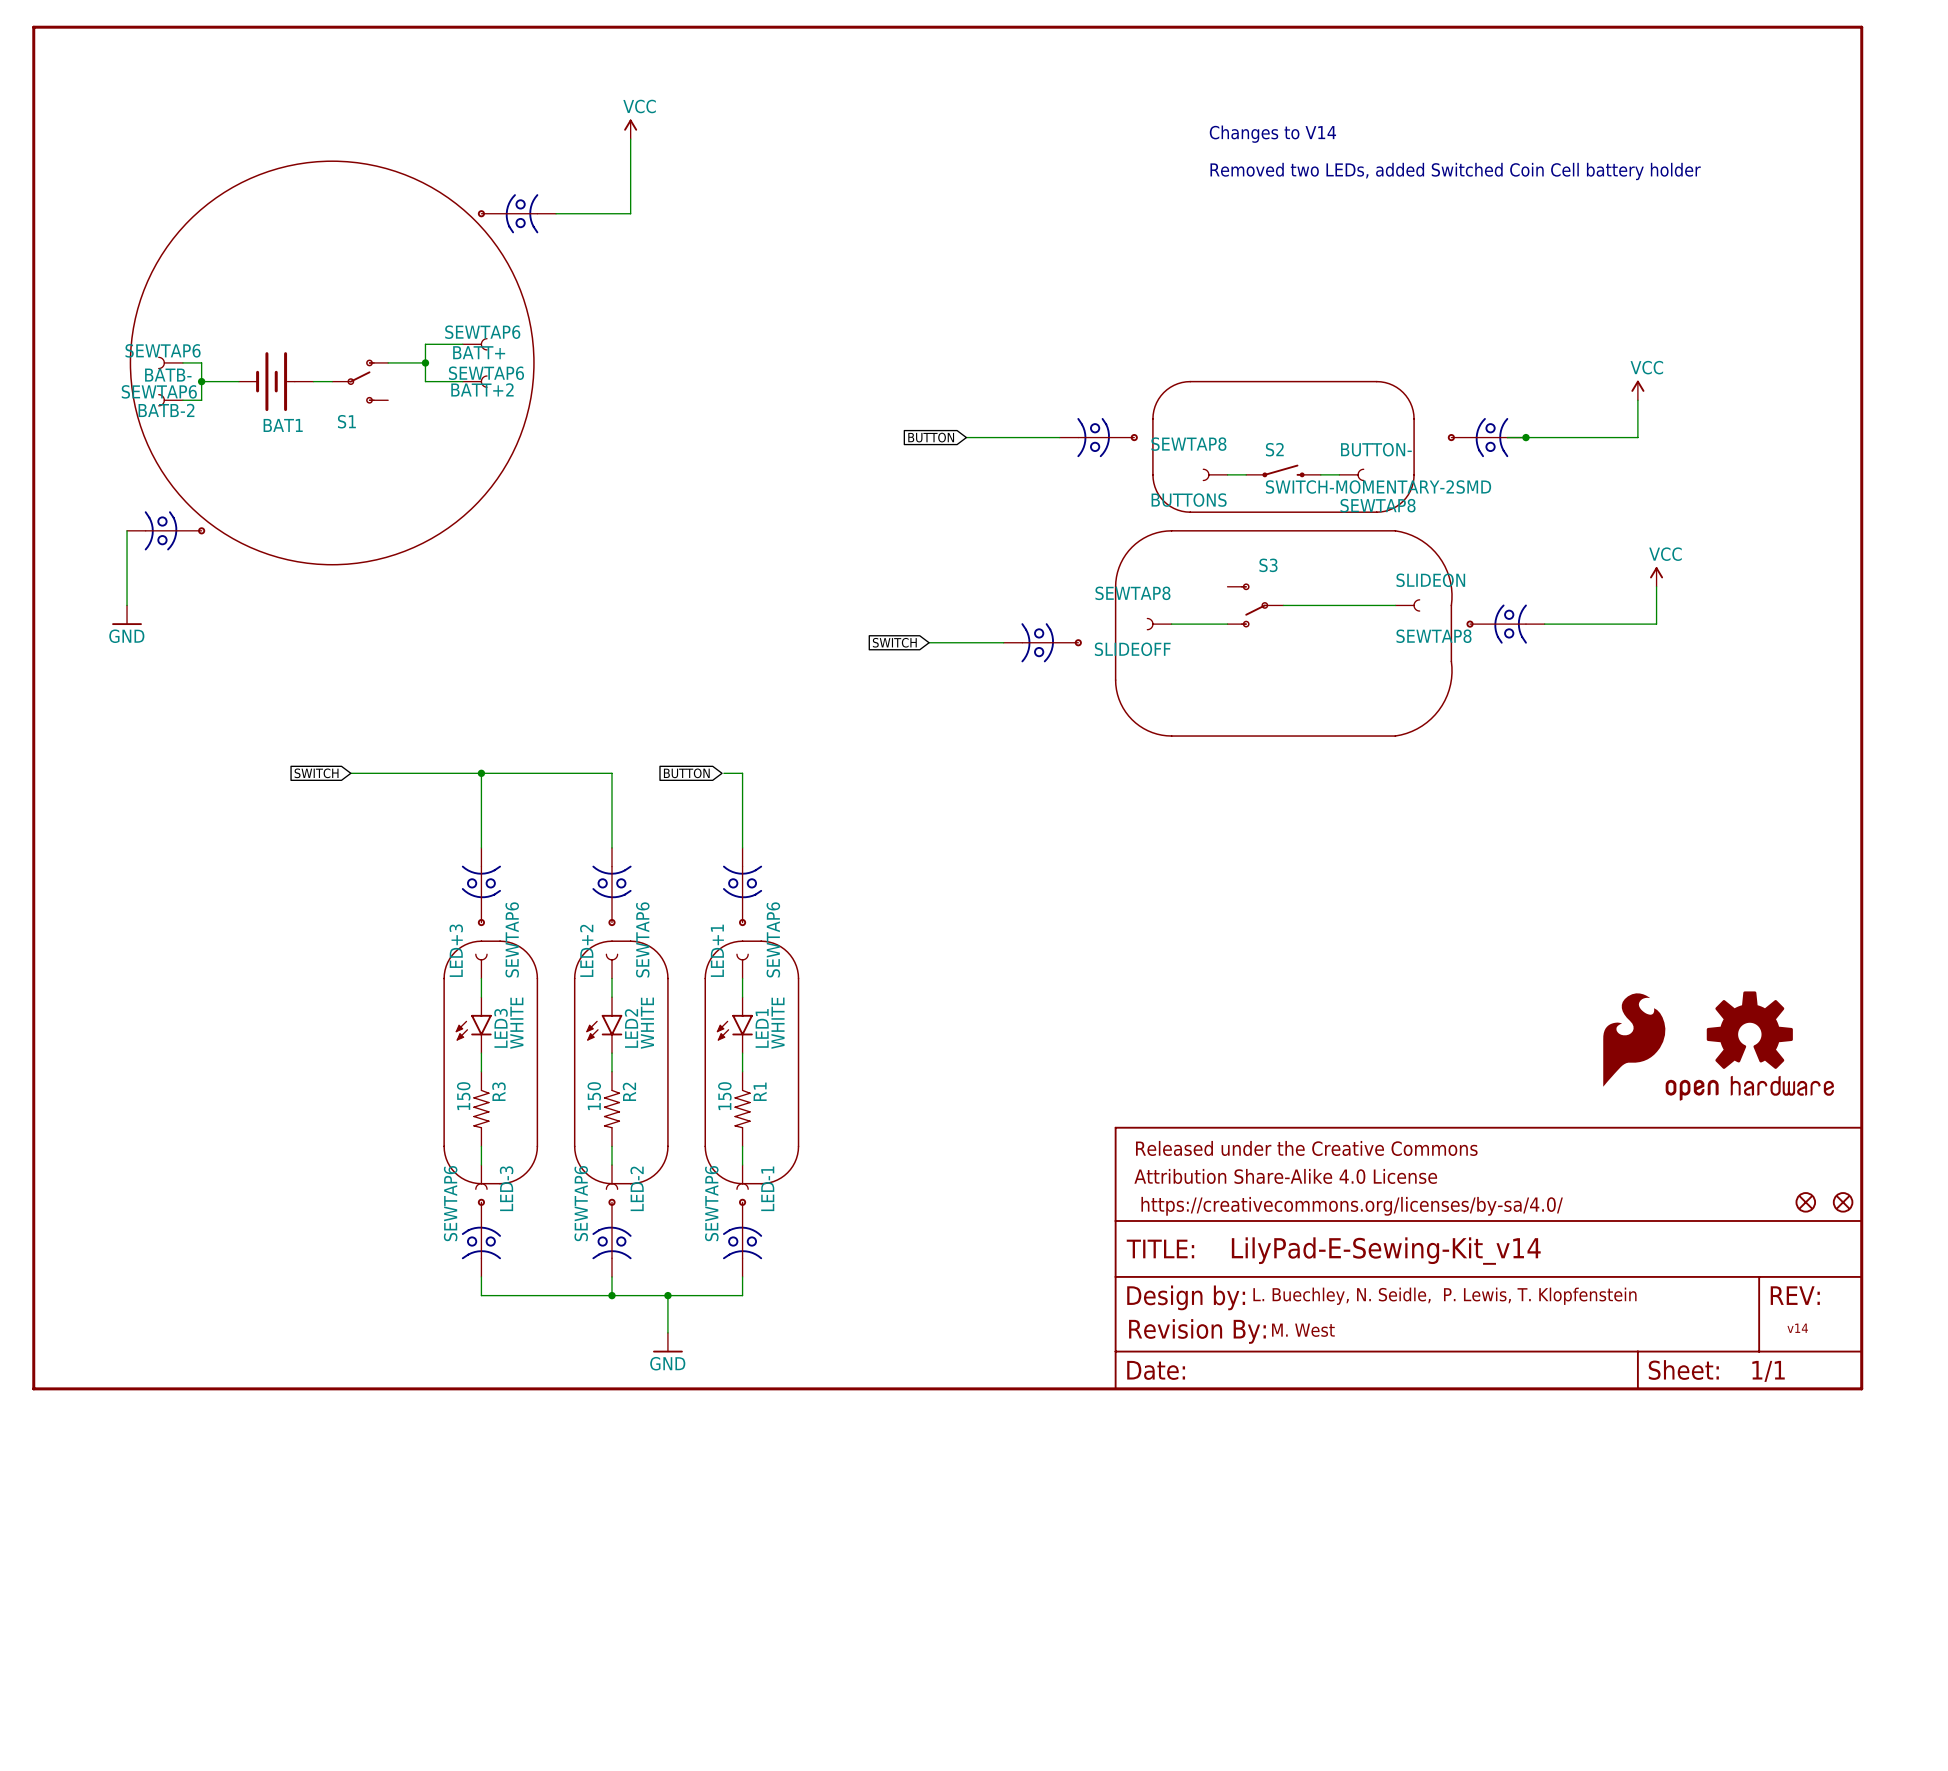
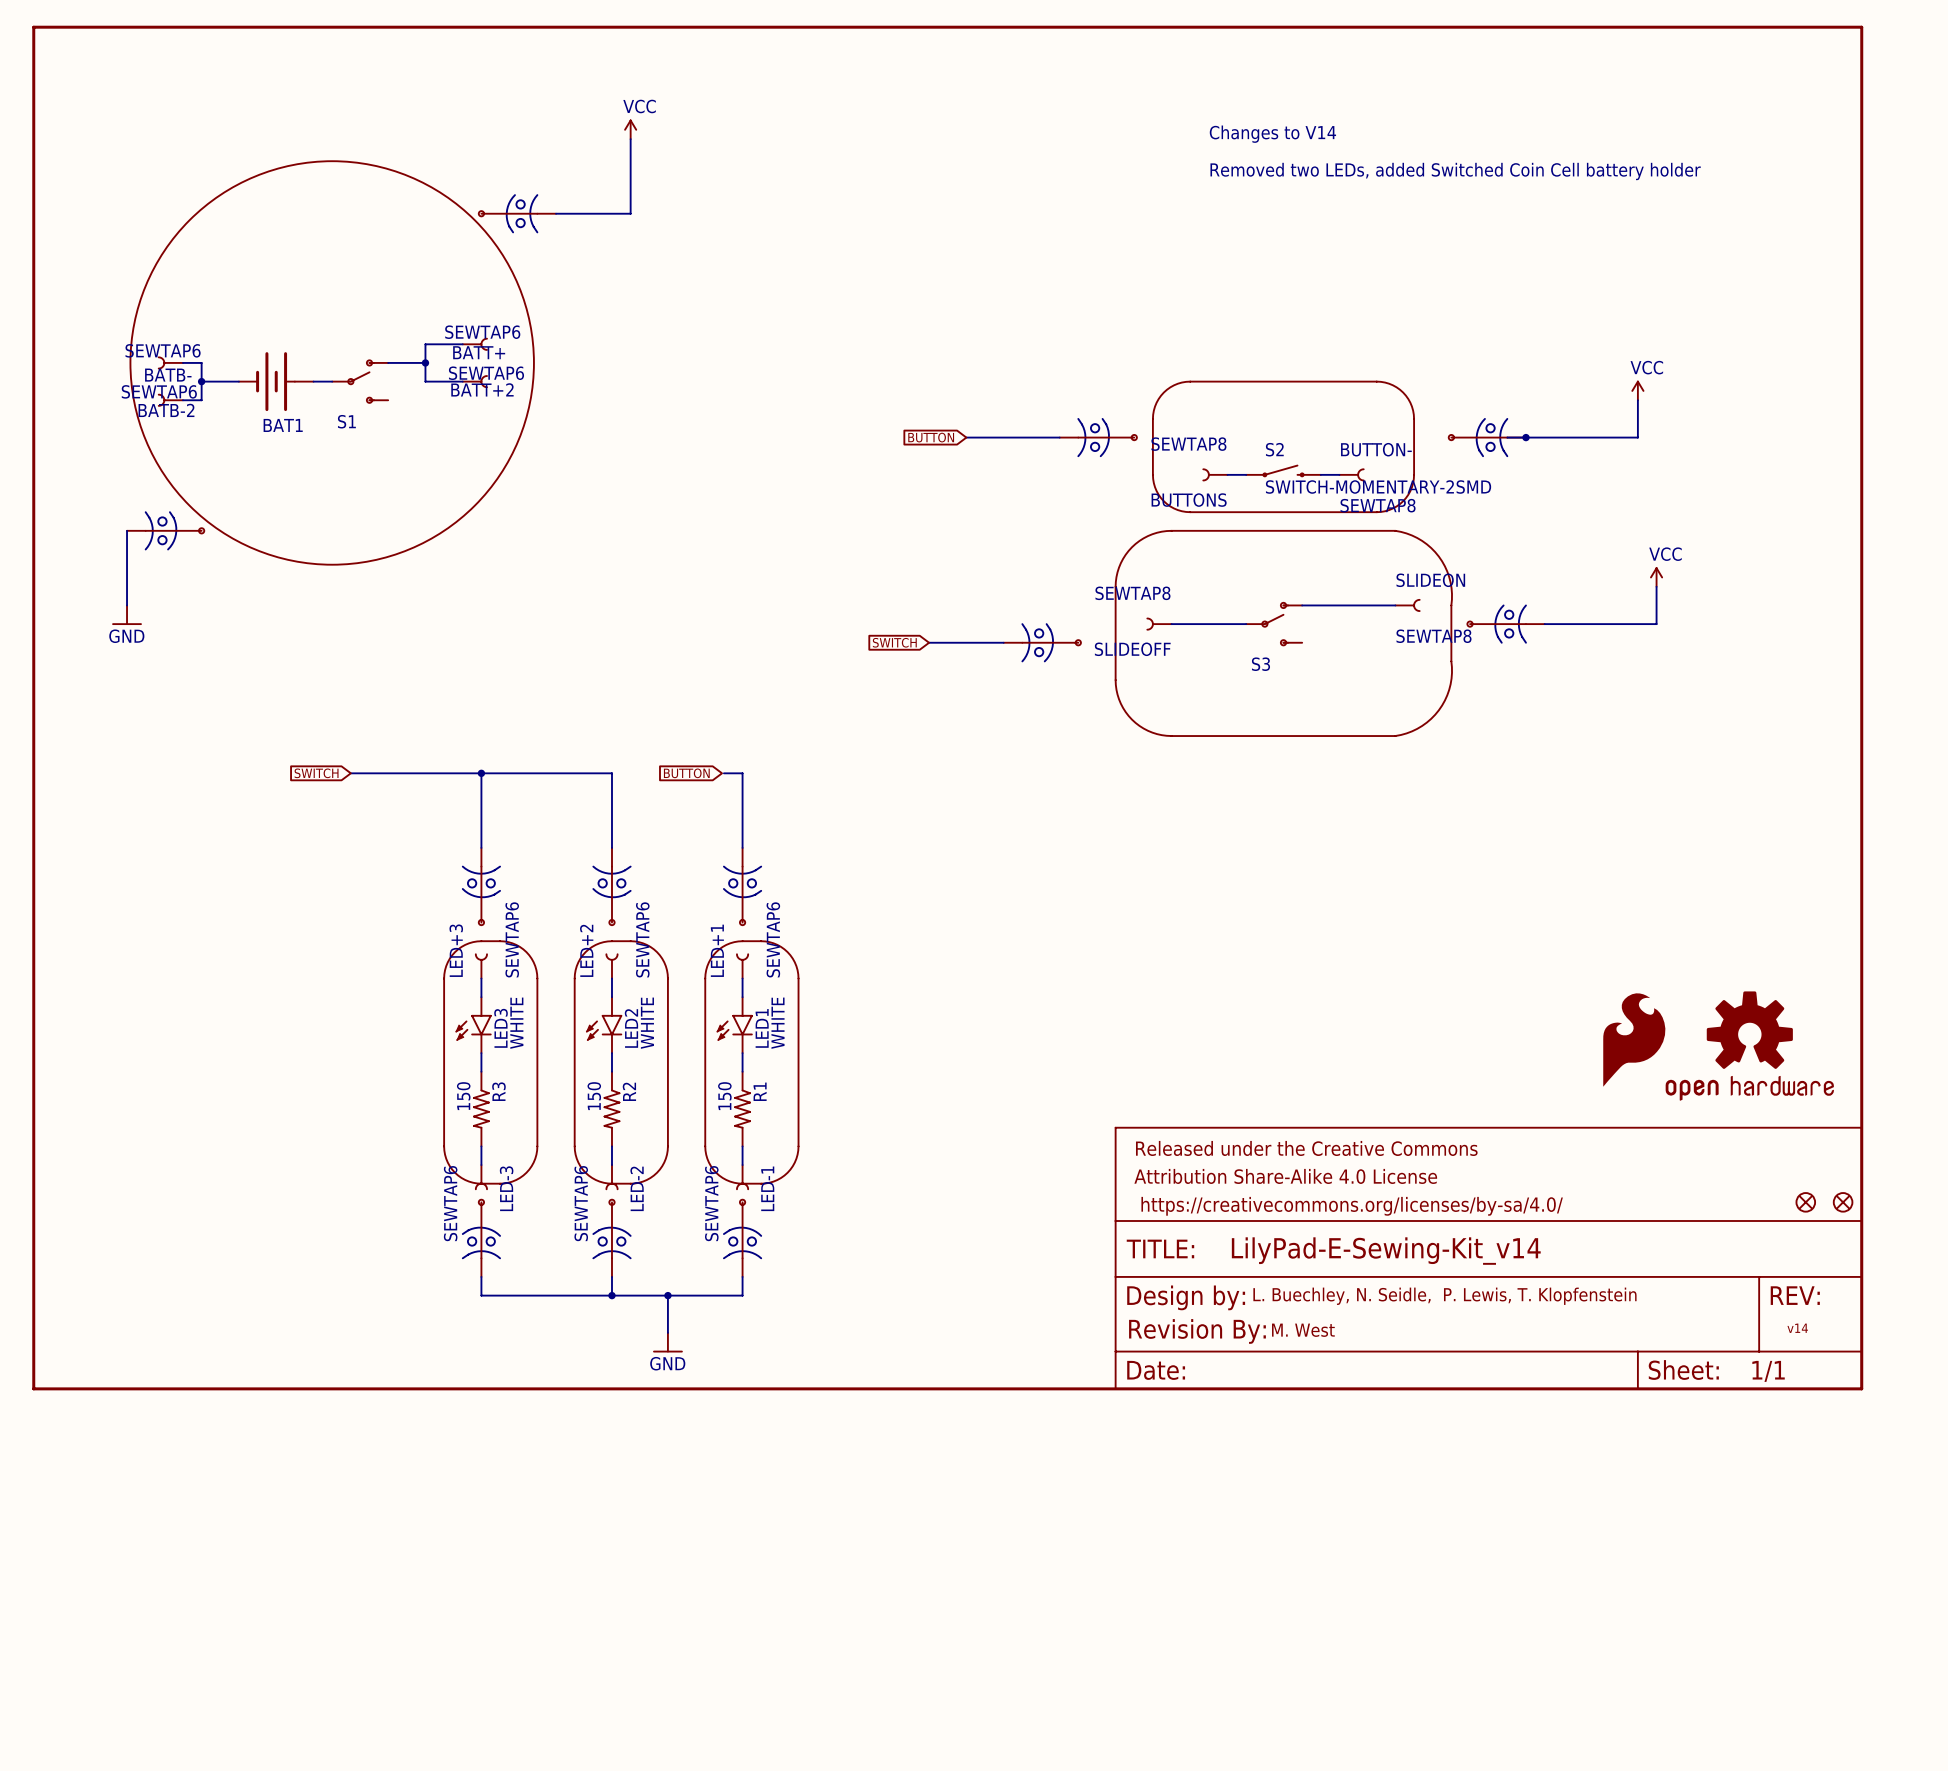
S3 rotation: 0° (1254, 605) -> 180° (1275, 624)

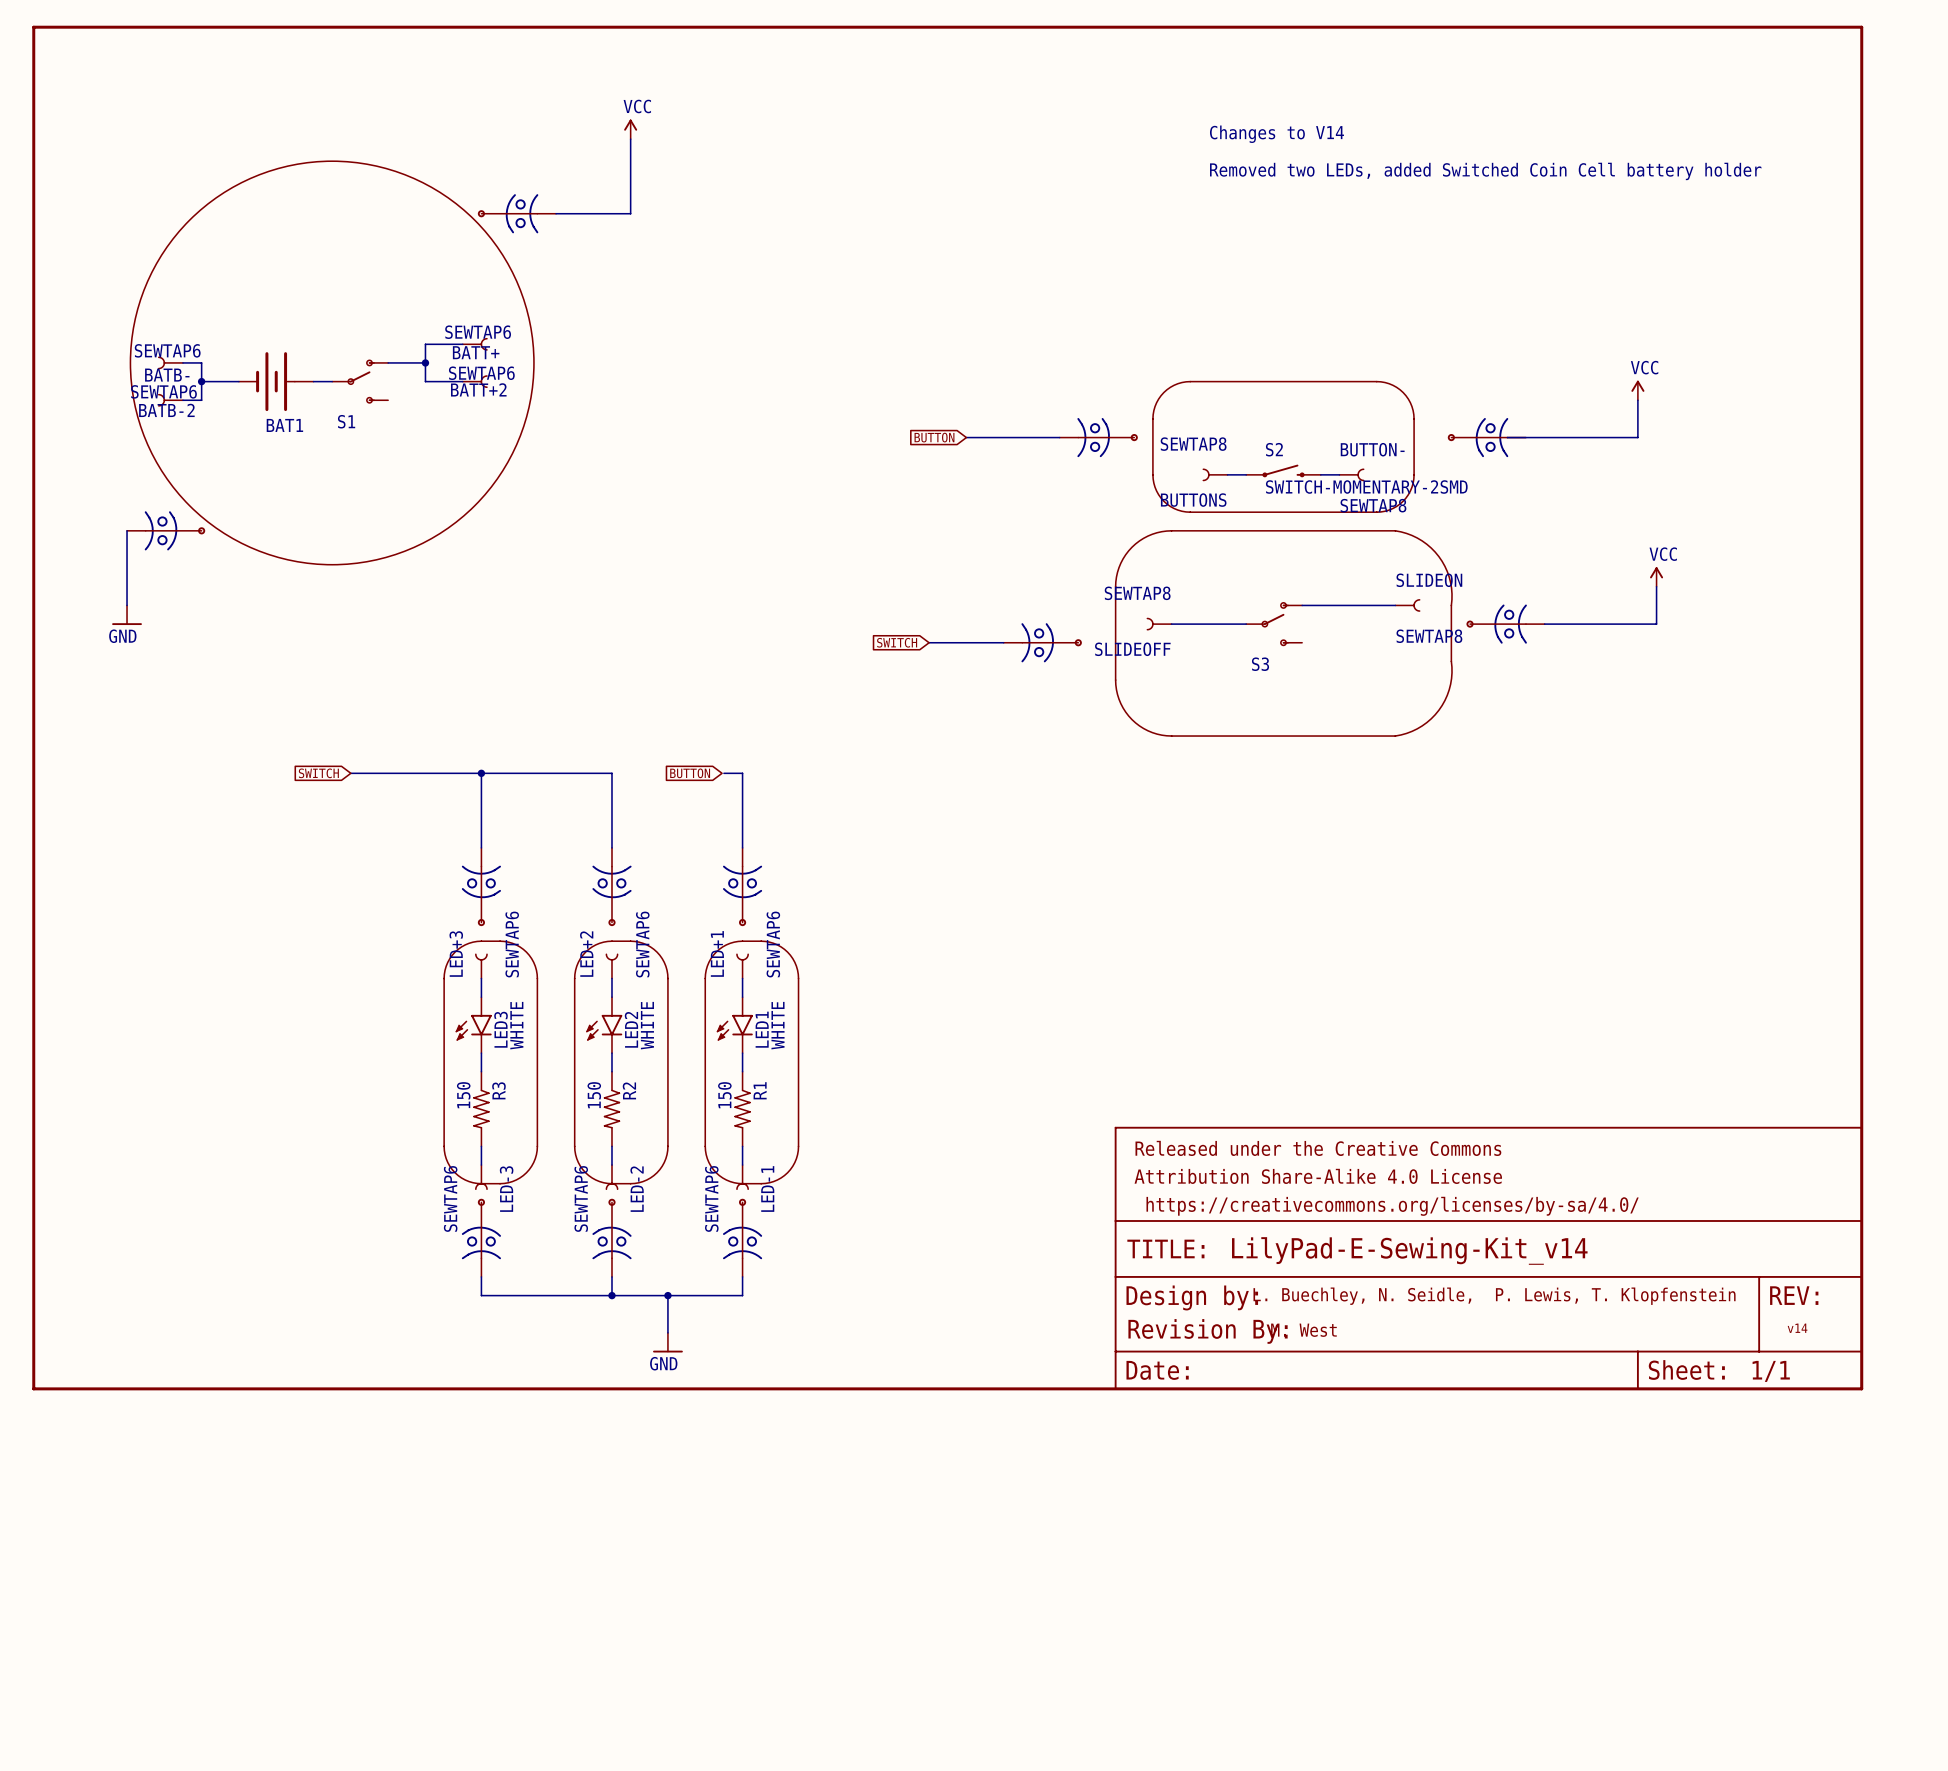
junction: (1525, 437) -> none
part: (1634, 1040) -> none
part: (1749, 1046) -> none
part: (1805, 1202) -> none
part: (1843, 1202) -> none

